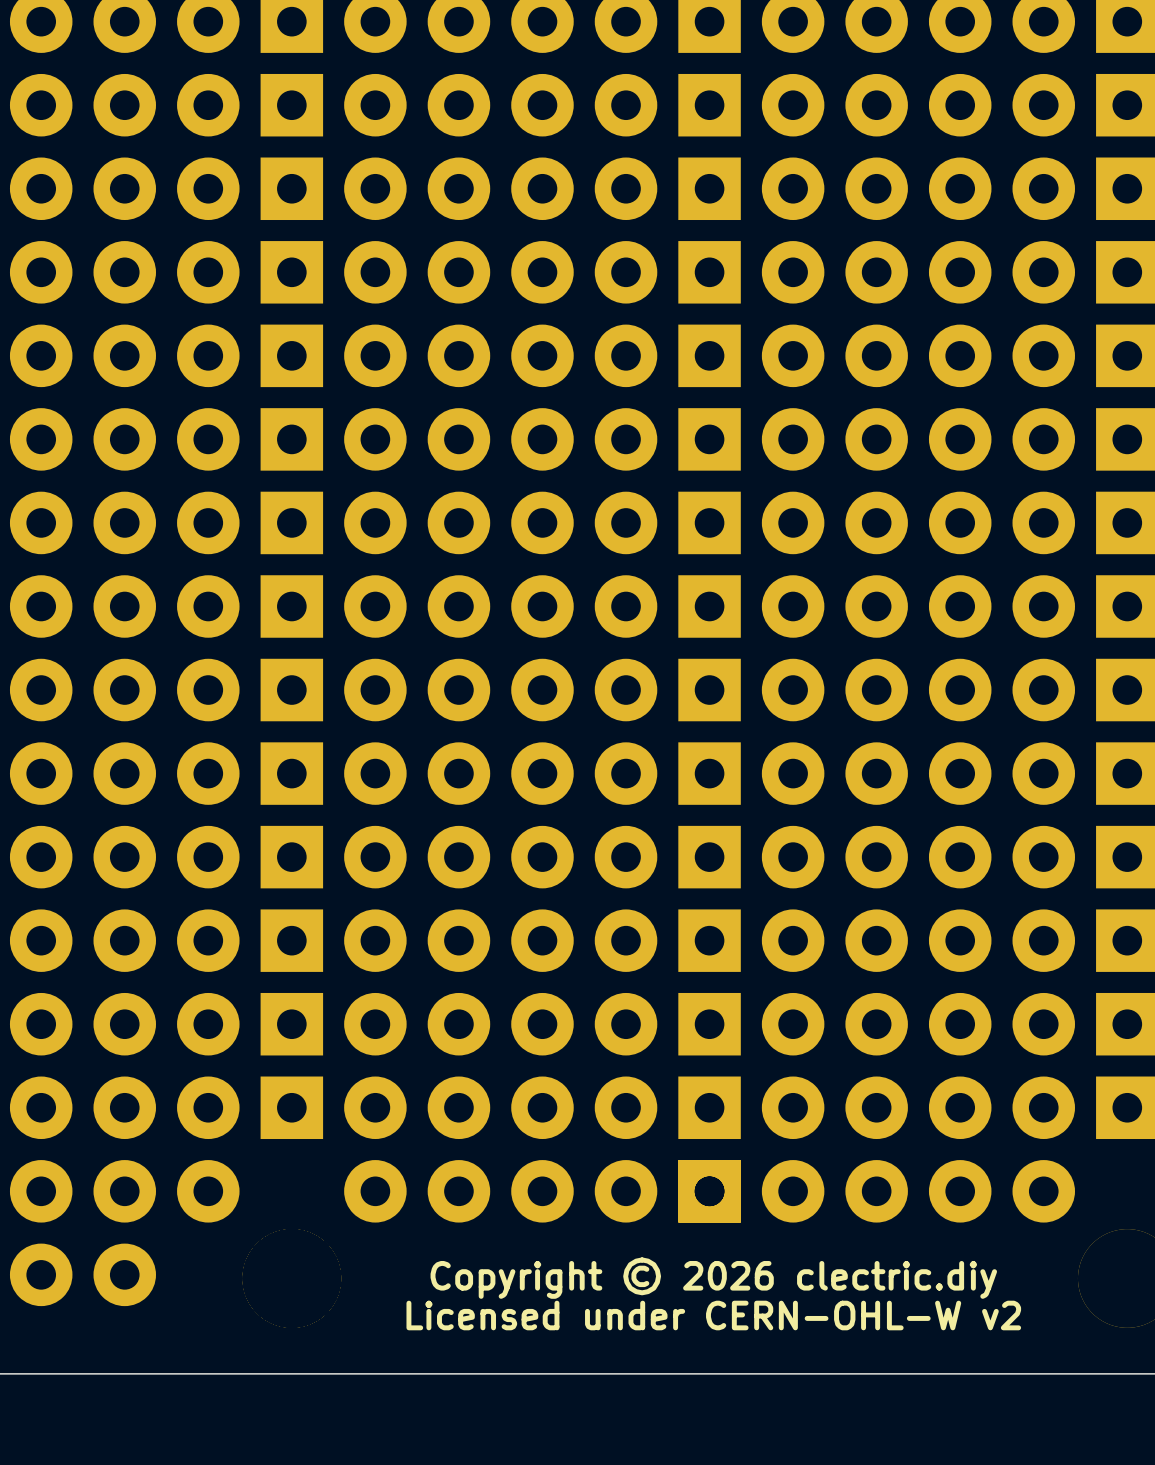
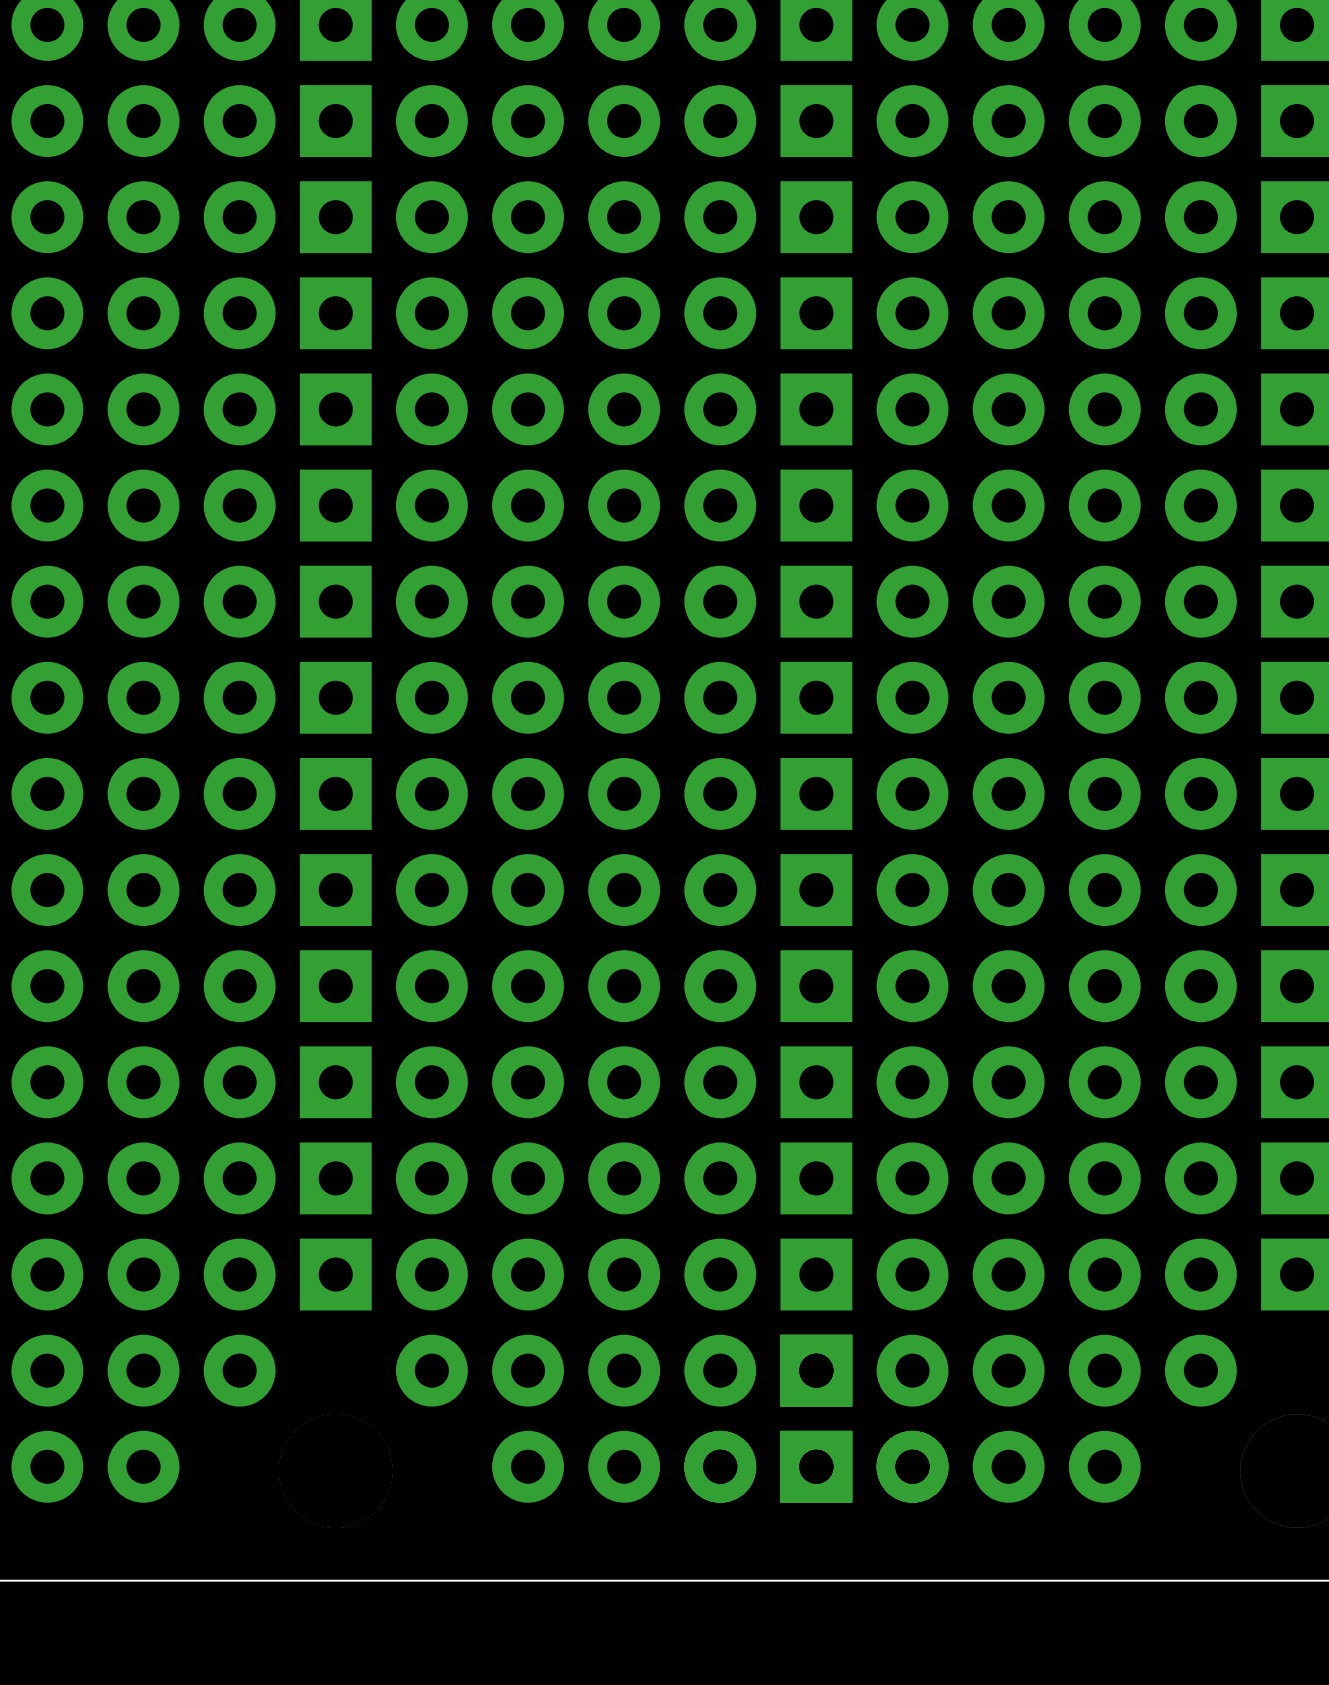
part: none -> (528, 1466)
part: none -> (624, 1466)
part: none -> (720, 1466)
part: none -> (816, 1466)
part: none -> (912, 1466)
part: none -> (1008, 1466)
part: none -> (1104, 1466)
text: Copyright © 2026 clectric.diy (713, 1278) -> none
text: Licensed under CERN-OHL-W v2 (713, 1315) -> none

